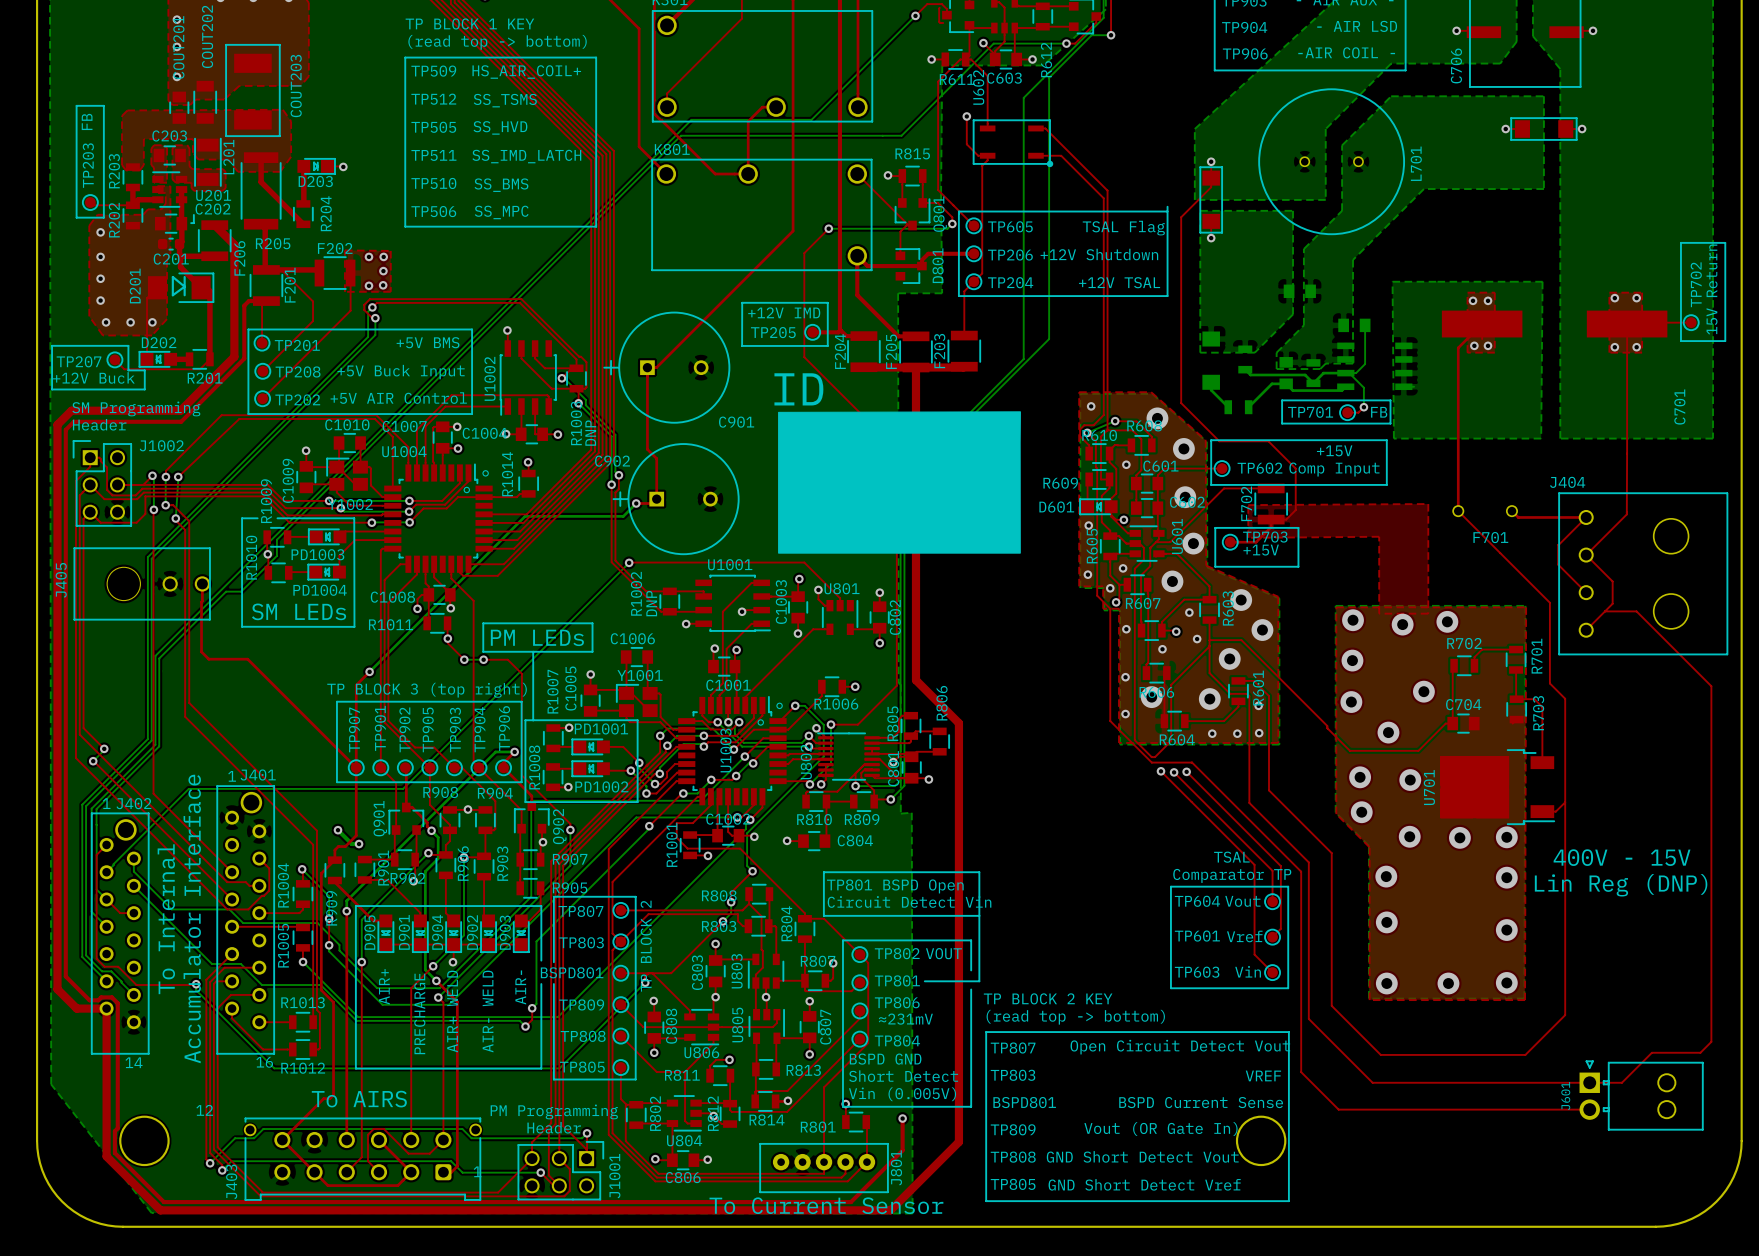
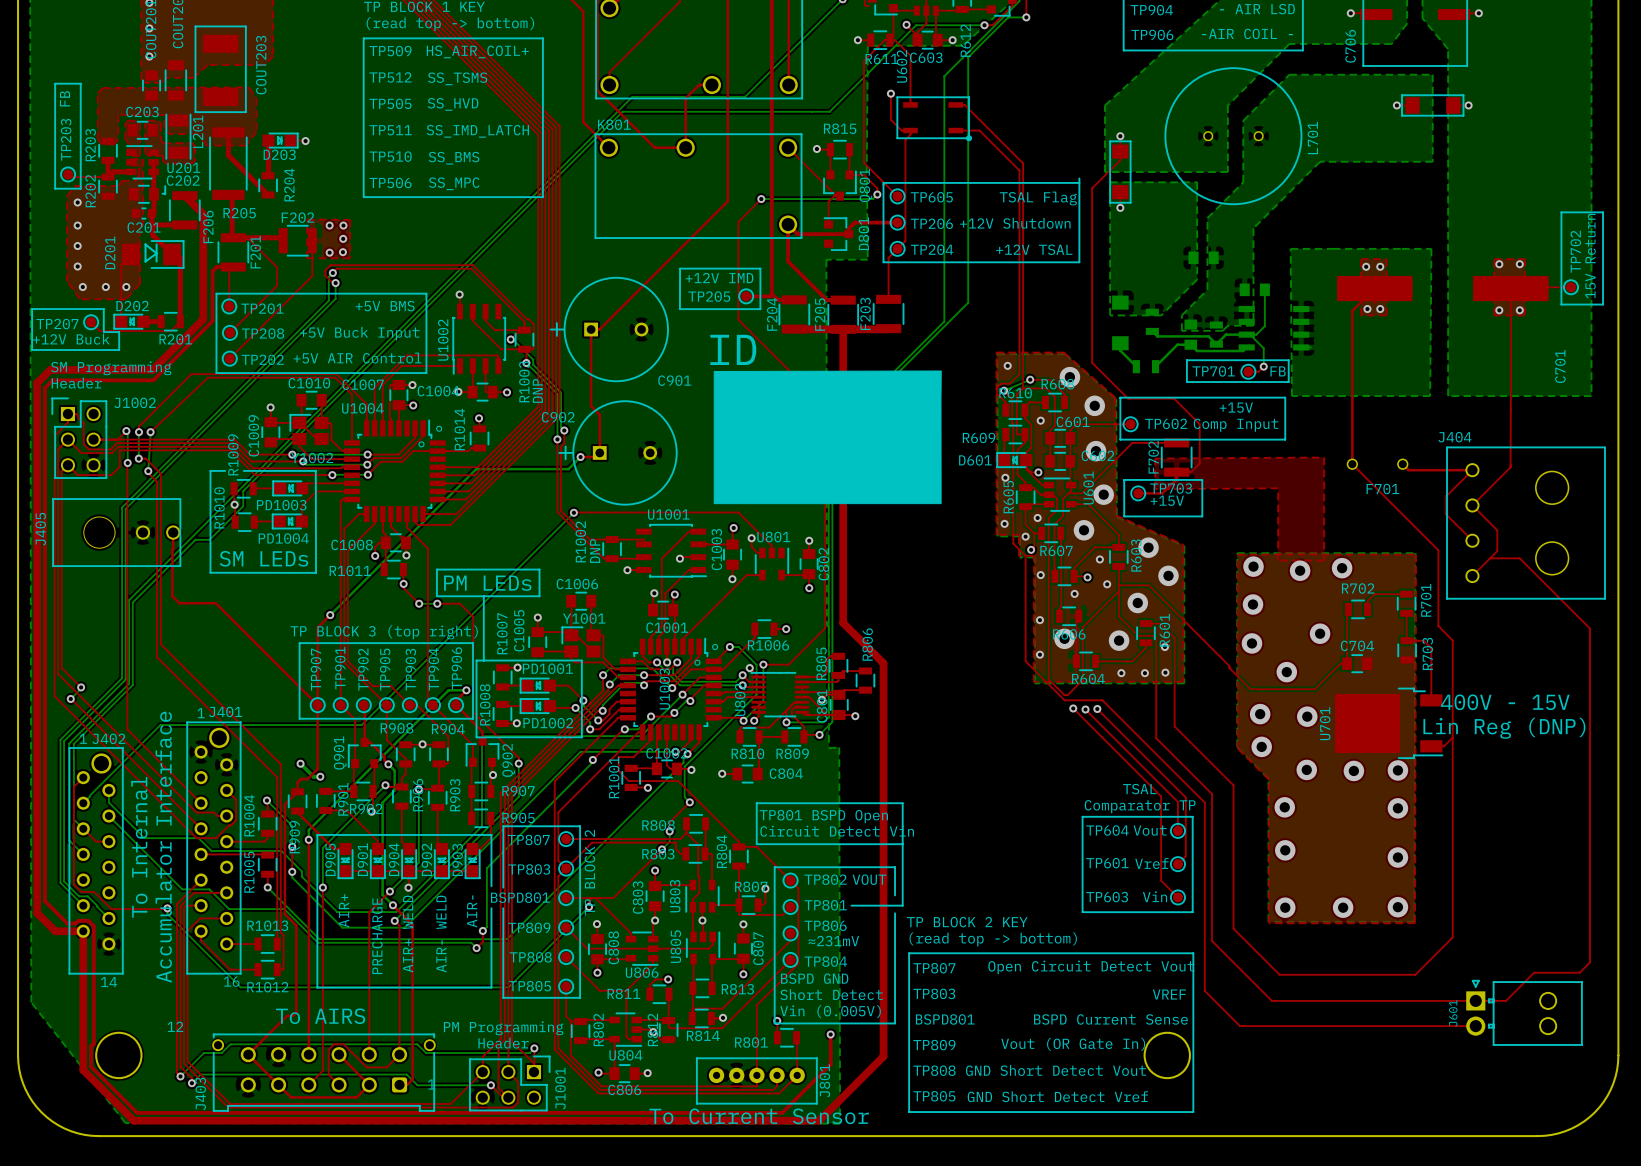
text position: 400V - 15V (1622, 857) -> 400V - 15V (1505, 702)
text position: Lin Reg (DNP) (1621, 885) -> Lin Reg (DNP) (1504, 728)

